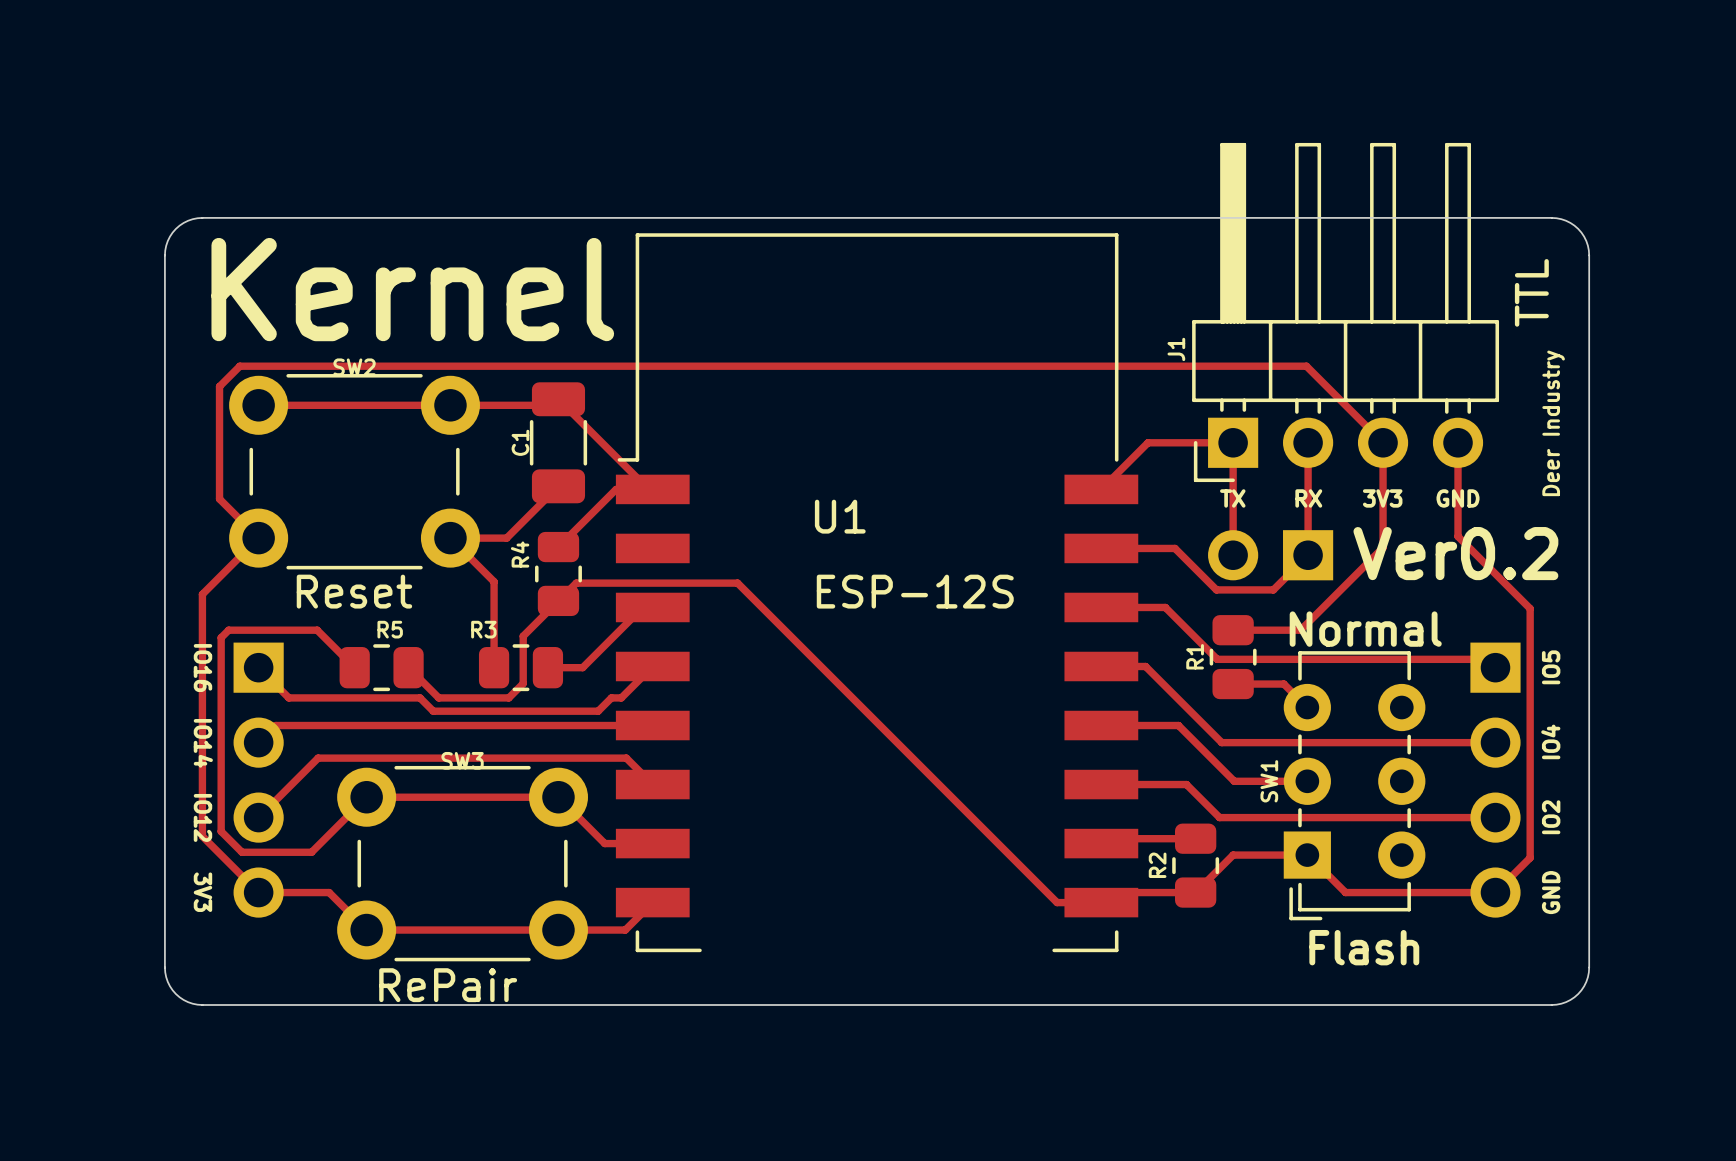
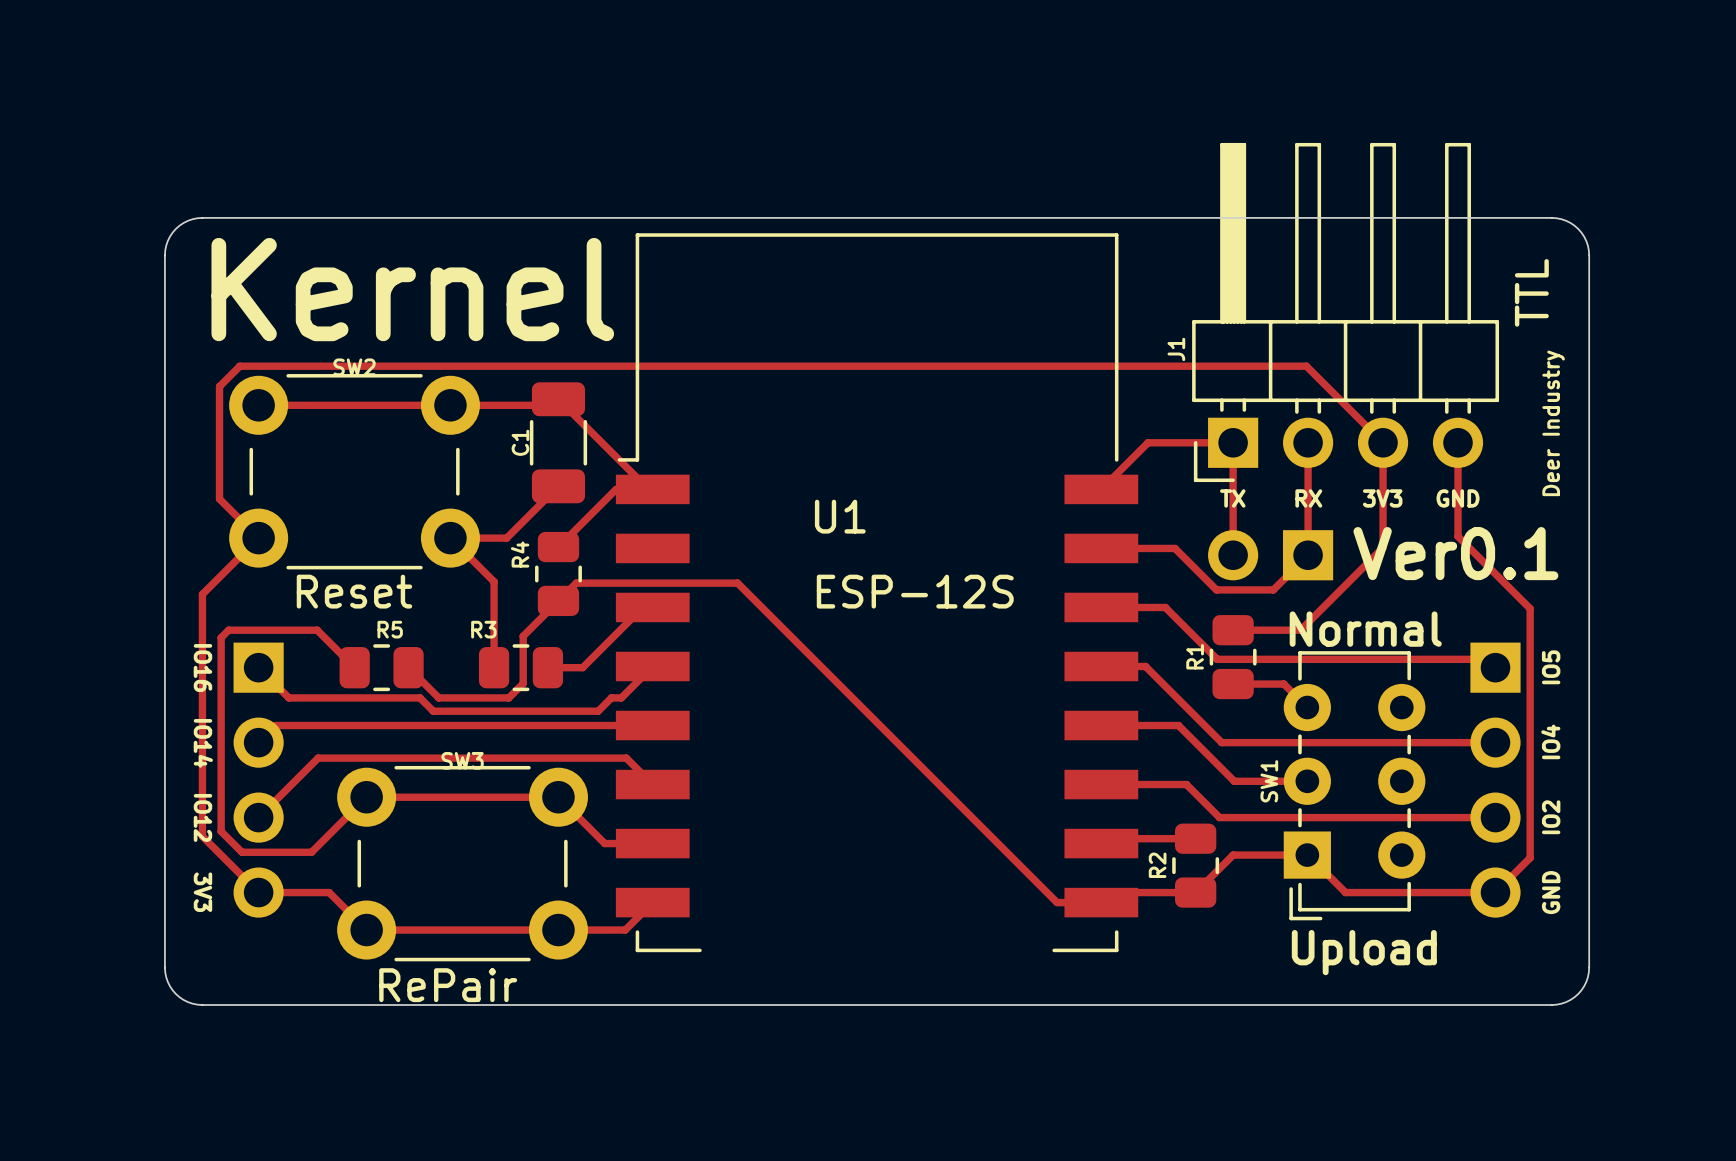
text: Ver0.2 (1455, 553) -> Ver0.1 (1455, 553)
text: Flash (1364, 947) -> Upload (1364, 952)

